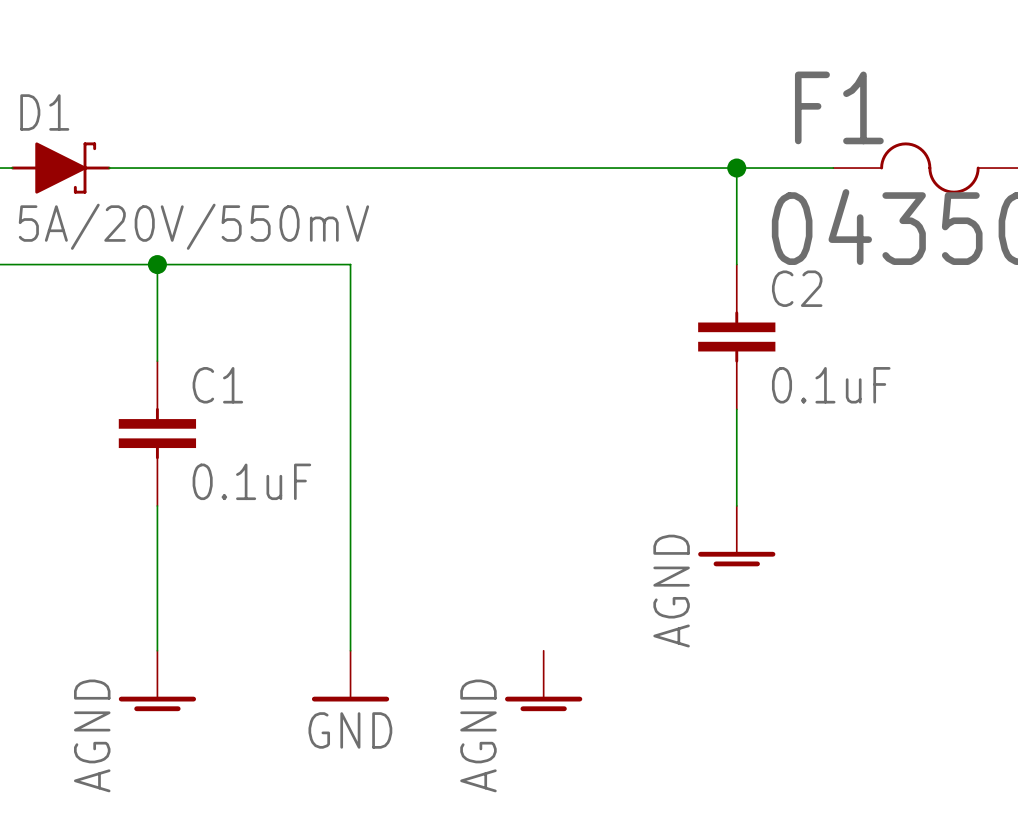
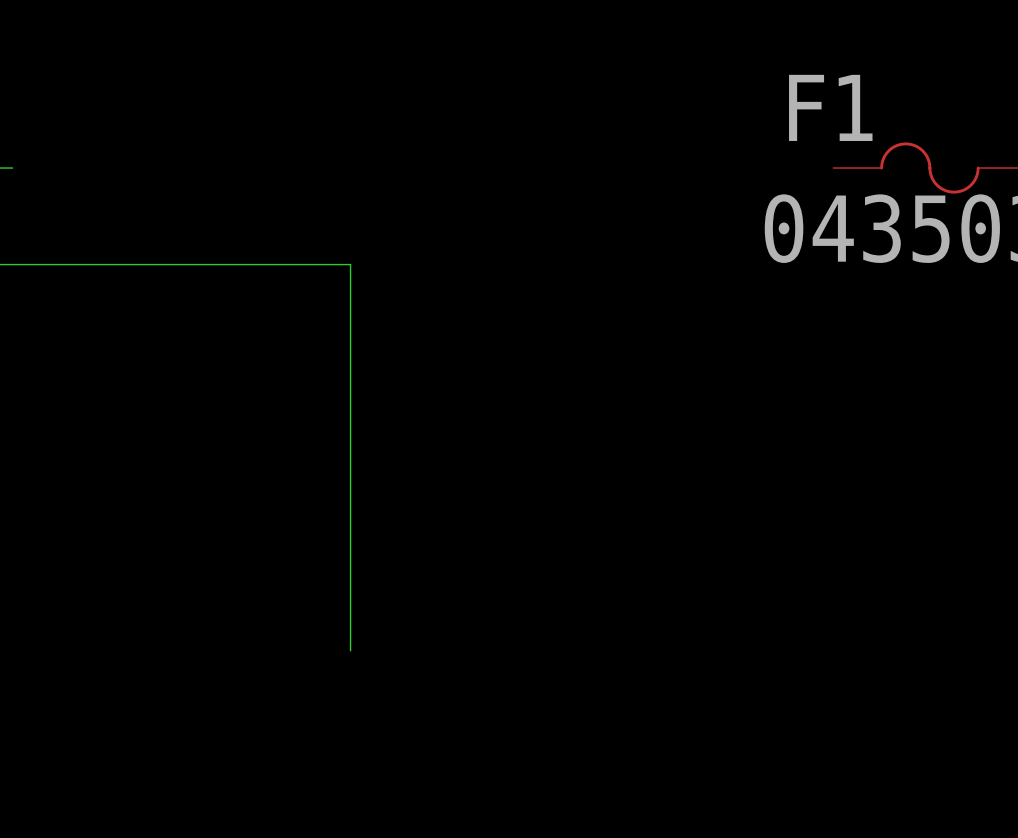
D1: 5A/20V/550mV (60, 168) -> none
wire: (109, 168) (833, 168) -> none
wire: (736, 168) (736, 264) -> none
junction: (736, 168) -> none
wire: (157, 264) (157, 361) -> none
junction: (157, 264) -> none
C2: 0.1uF (736, 336) -> none
wire: (736, 409) (736, 505) -> none
C1: 0.1uF (157, 433) -> none
wire: (157, 505) (157, 650) -> none
power symbol: AGND (736, 536) -> none
power symbol: GND (350, 676) -> none
power symbol: AGND (157, 680) -> none
power symbol: AGND (543, 680) -> none

